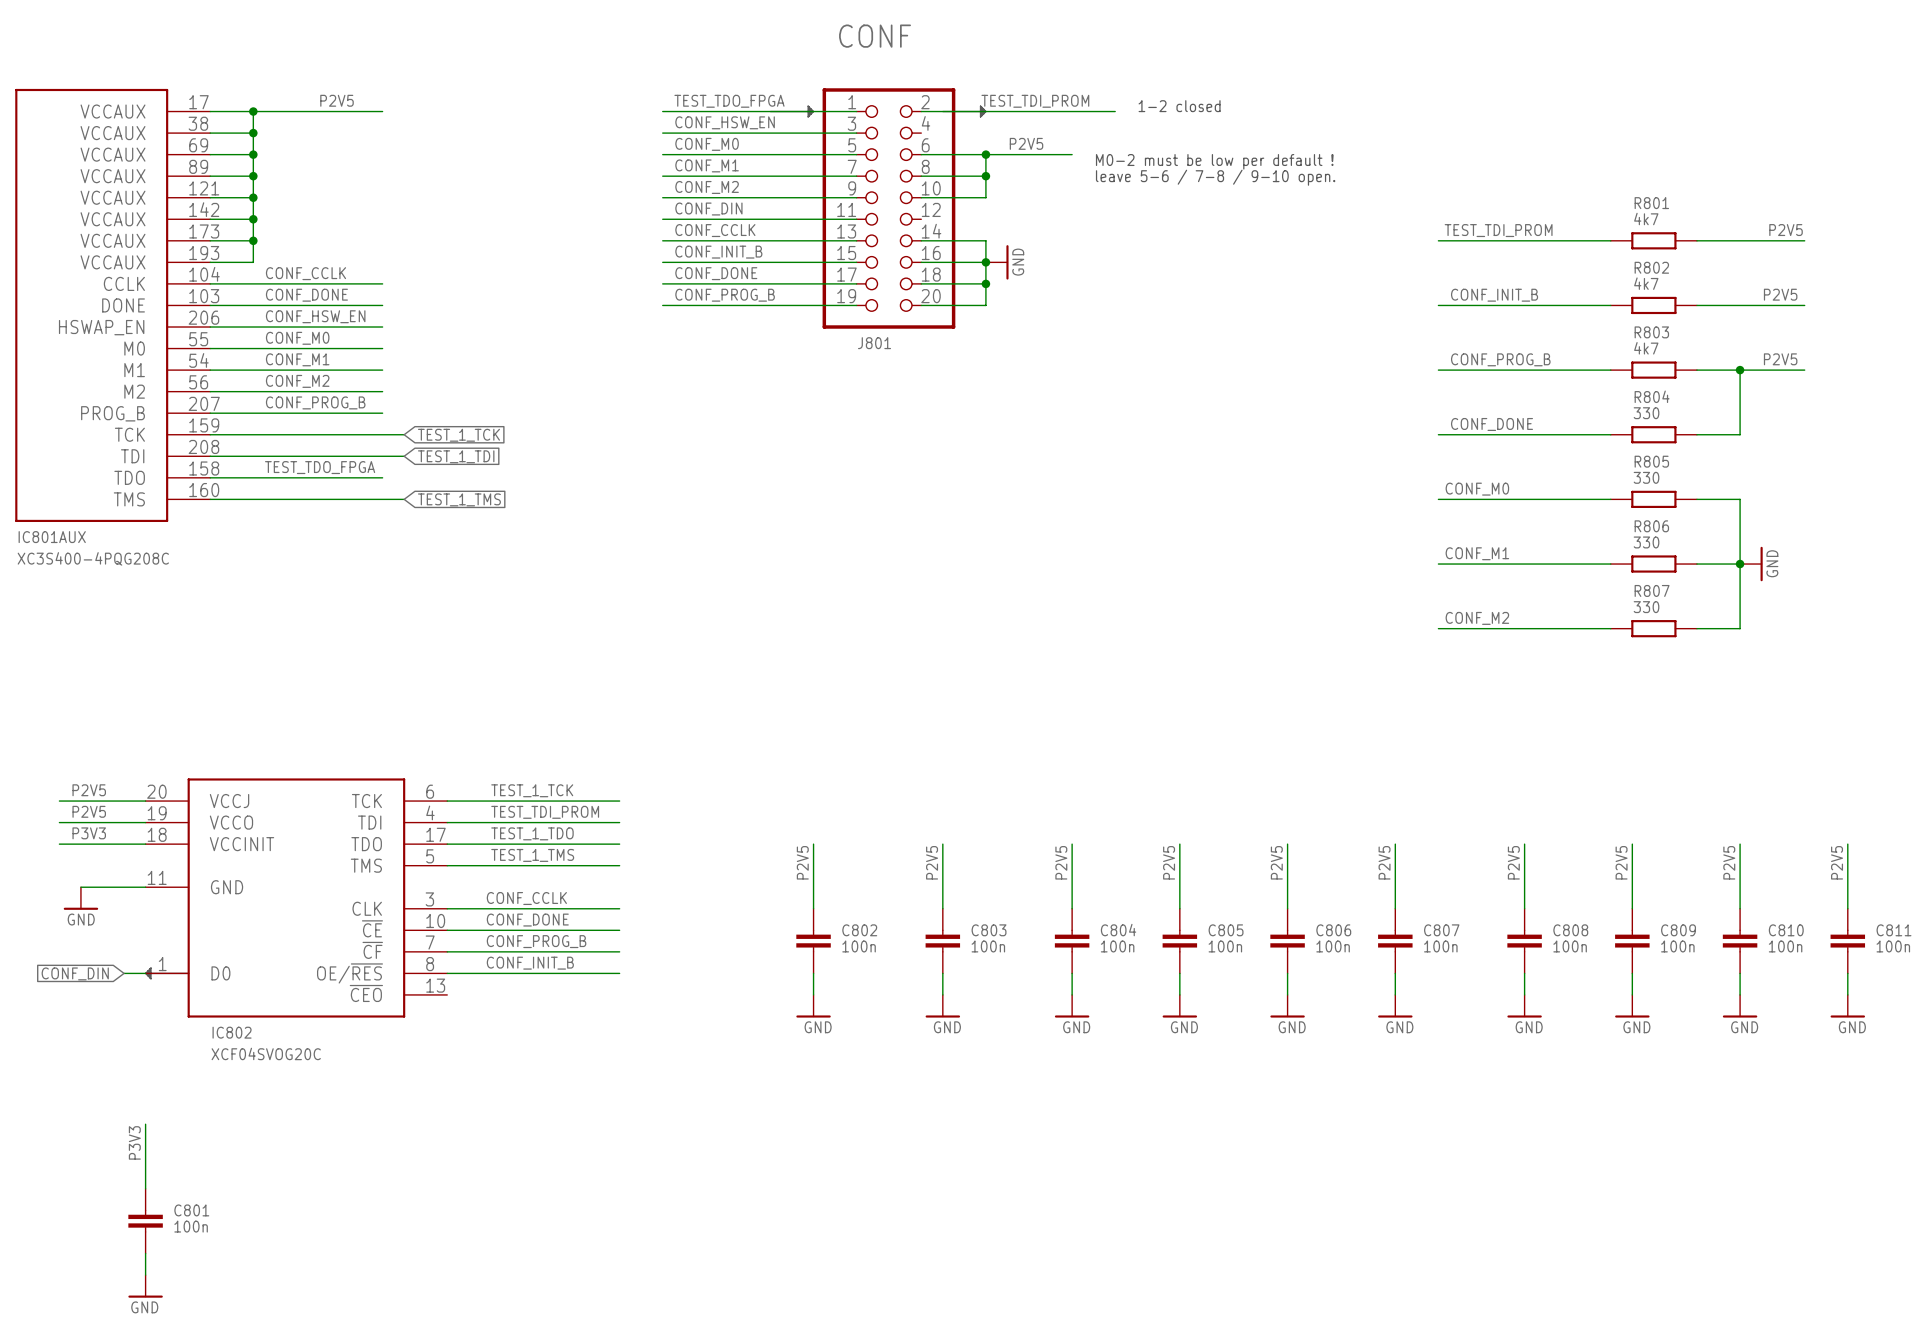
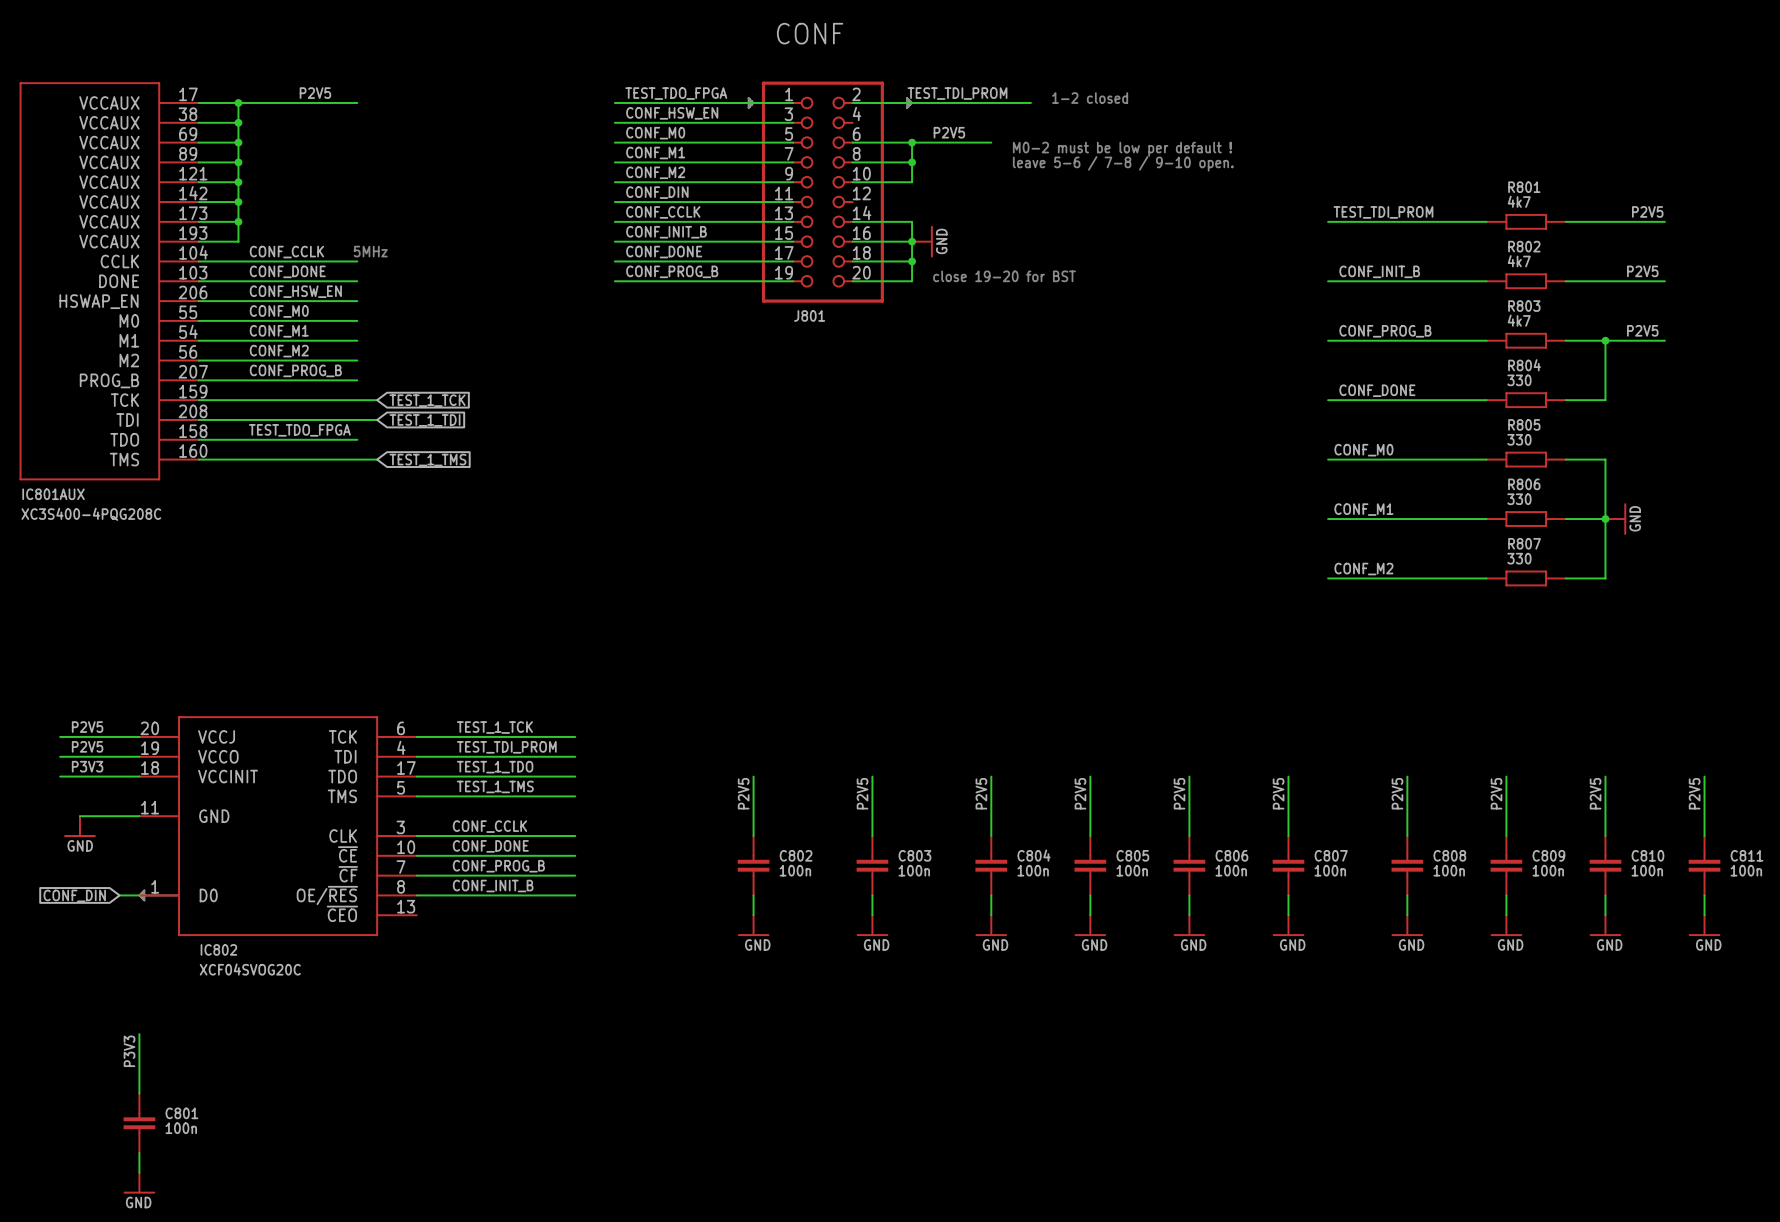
text: none -> 5MHz (370, 251)
text: none -> close 19-20 for BST (1004, 276)

